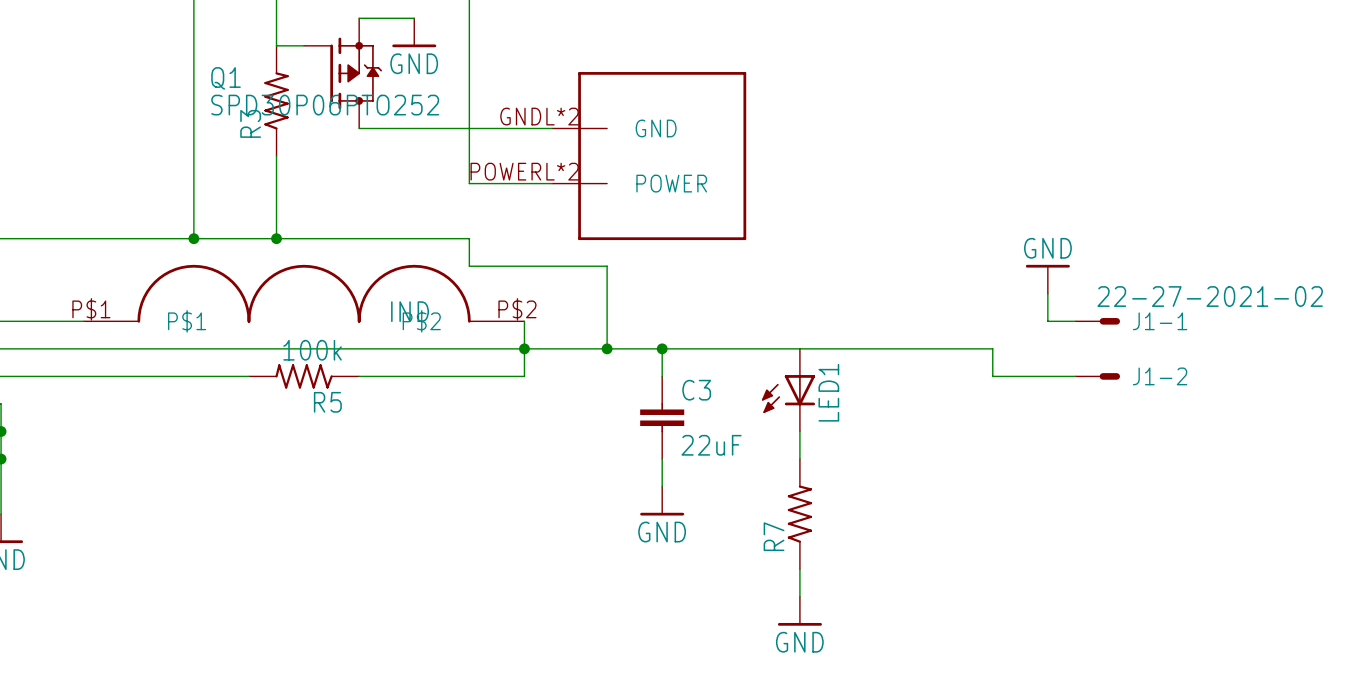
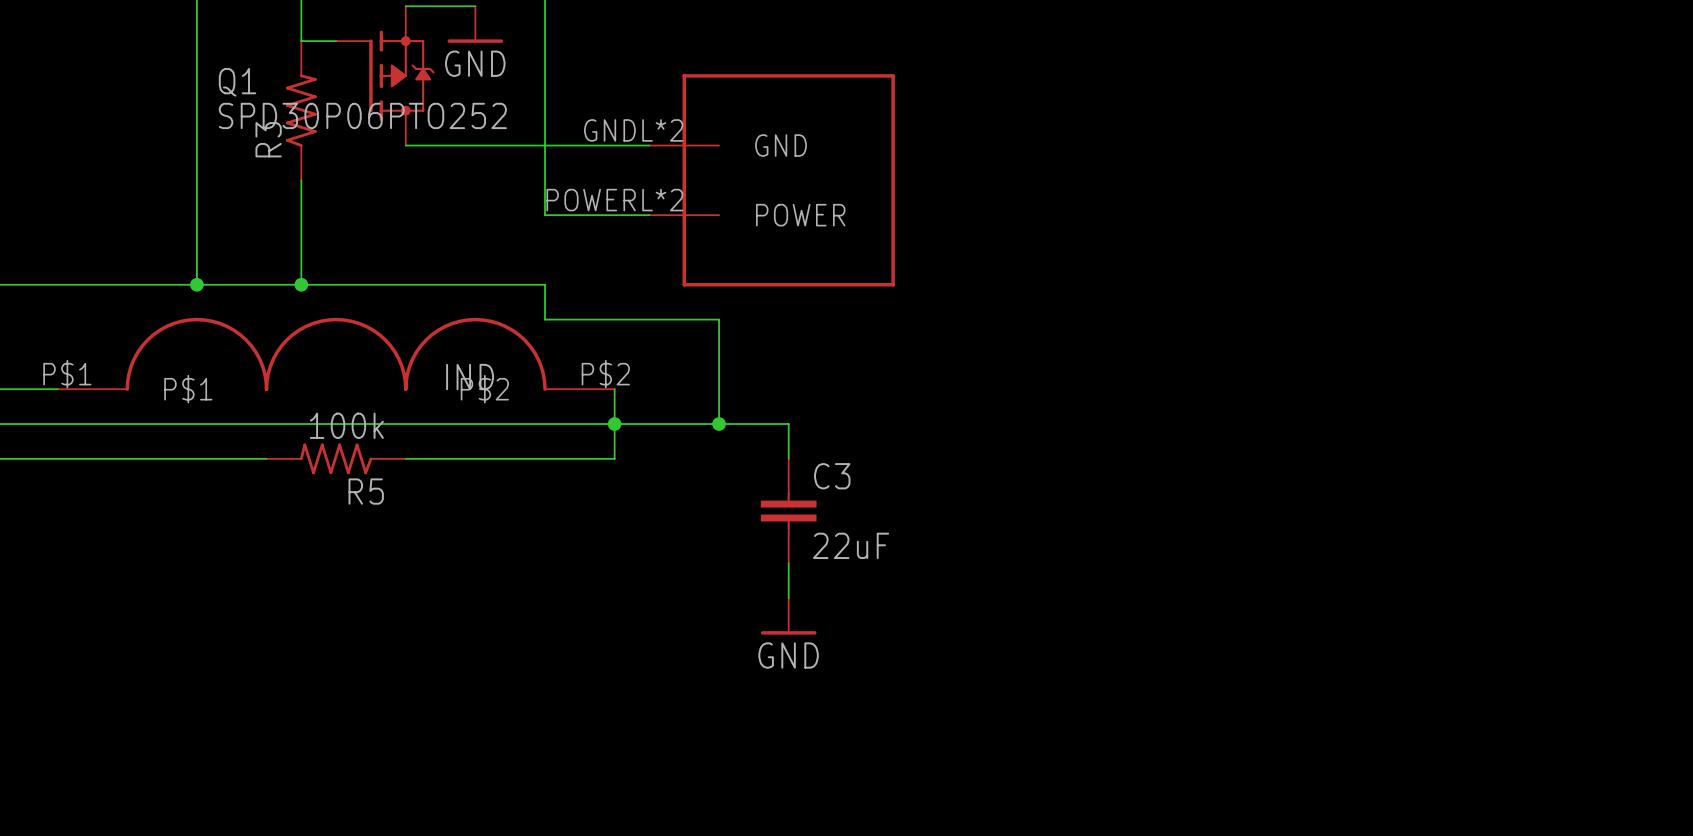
power symbol: GND (1047, 279) -> none
wire: (1047, 293) (1047, 321) (1075, 321) -> none
J1-1: 22-27-2021-02 (1097, 321) -> none
wire: (662, 348) (992, 348) (992, 376) (1075, 376) -> none
junction: (662, 348) -> none
J1-2: (1097, 376) -> none
LED1: (788, 390) -> none
wire: (799, 431) (799, 459) -> none
R7: (799, 514) -> none
wire: (799, 569) (799, 596) -> none
power symbol: GND (799, 611) -> none

